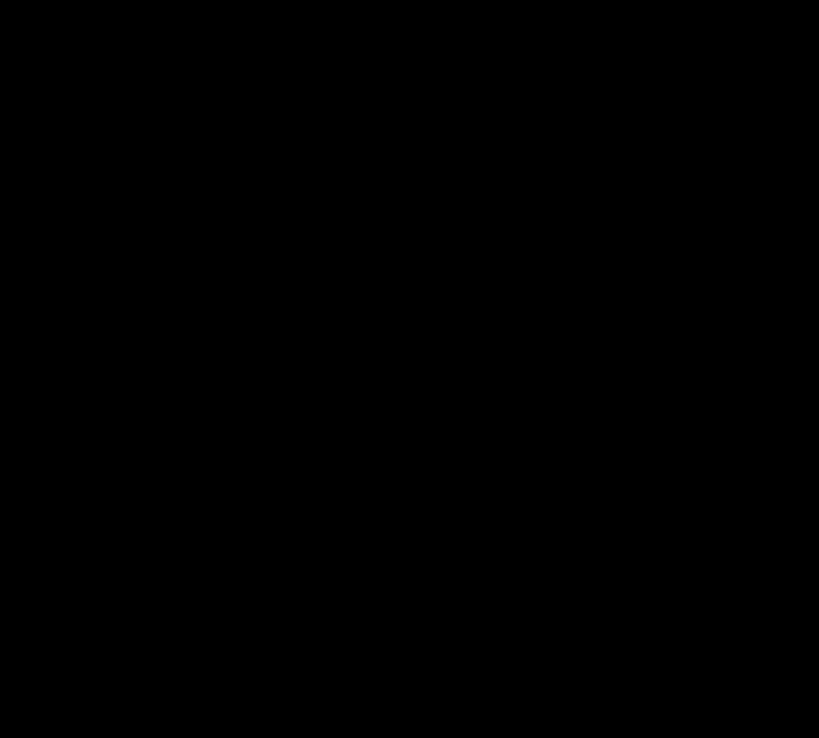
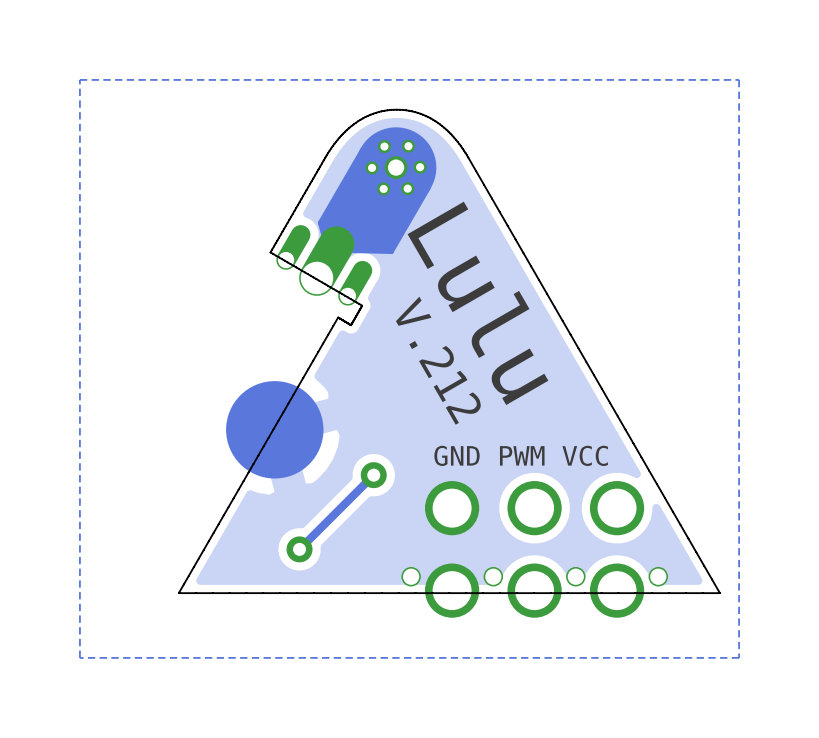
zone outline: none -> (739, 79) (79, 79) (79, 657) (739, 657) (739, 79)
part: none -> (356, 216)
text: none -> Lulu (477, 303)
board edge: none -> (339, 318) (178, 593) (719, 593) (465, 153) (444, 127) (430, 118) (417, 112) (396, 109) (378, 112) (360, 119) (345, 131) (328, 153) (270, 252) (362, 305) (351, 325) (349, 324)
board edge: none -> (340, 318) (344, 321)
board edge: none -> (345, 321) (349, 324)
text: none -> V.212 (438, 360)
part: none -> (274, 429)
text: none -> GND PWM VCC (521, 455)
track: none -> (373, 475) (299, 549)
via: none -> (373, 475)
via: none -> (299, 549)
part: none -> (534, 549)
via: none -> (411, 576)
via: none -> (493, 576)
via: none -> (575, 576)
via: none -> (658, 576)

